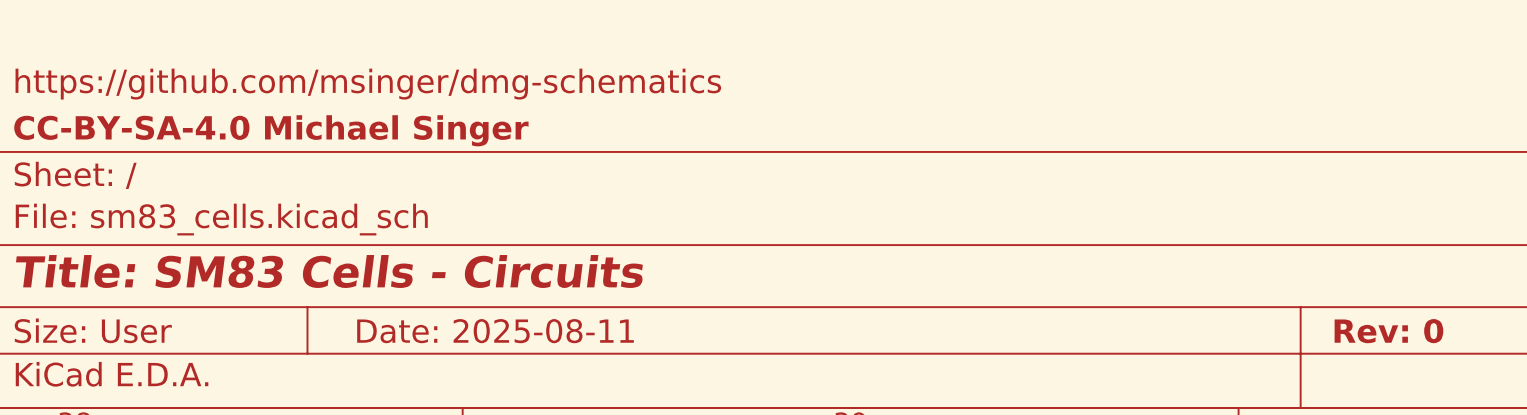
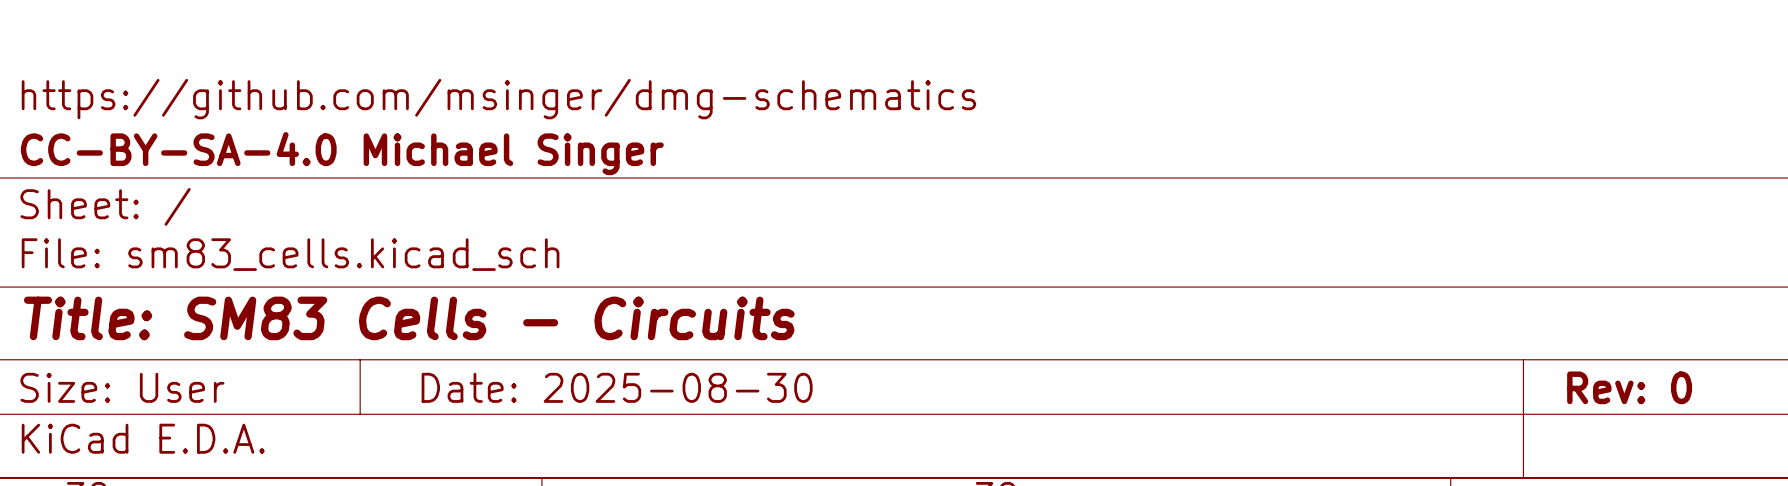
title block: Date: 2025-08-11 (495, 331) -> Date: 2025-08-30 (617, 387)

